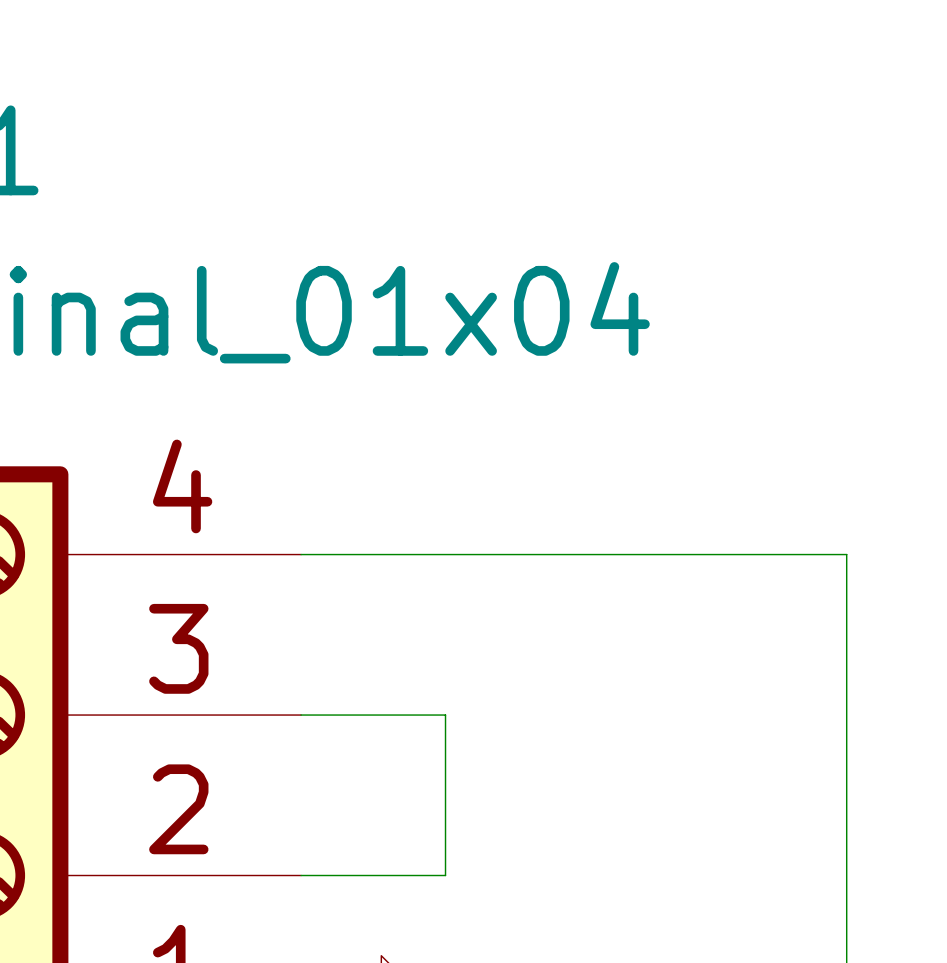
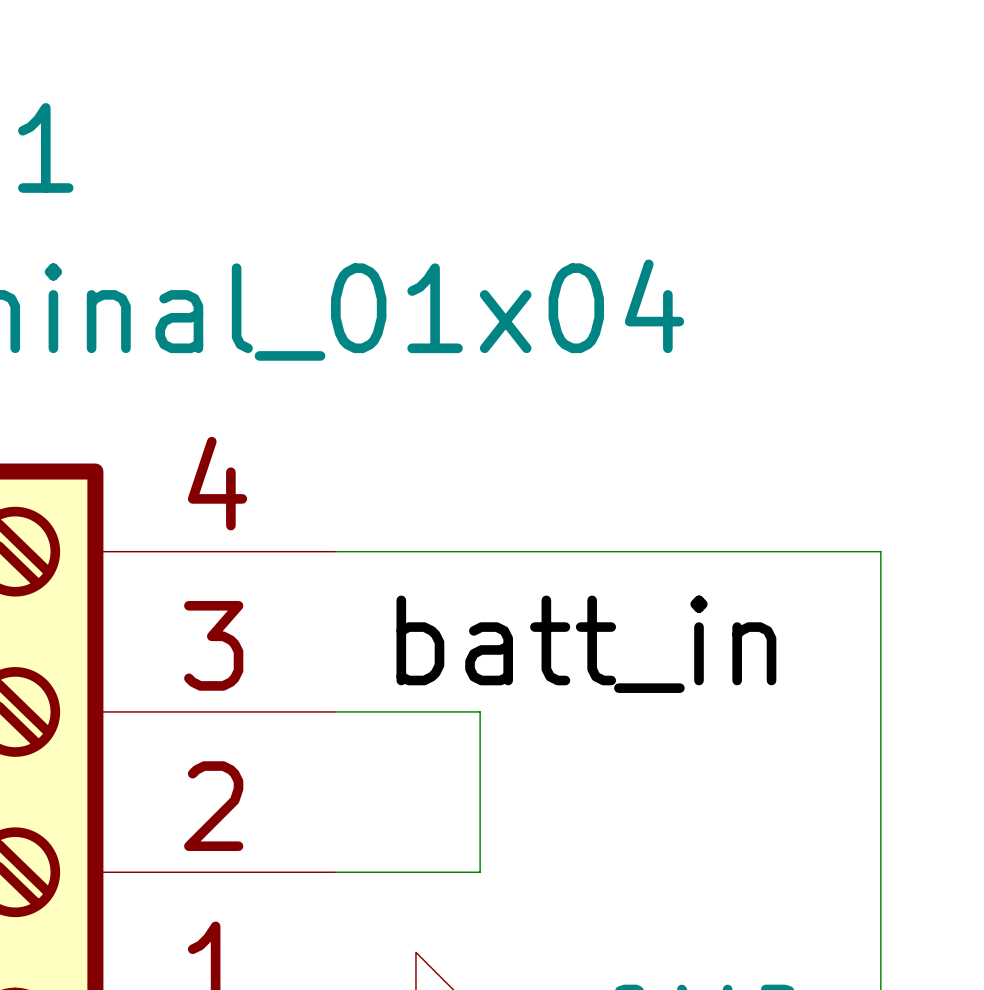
label: none -> batt_in (586, 644)

